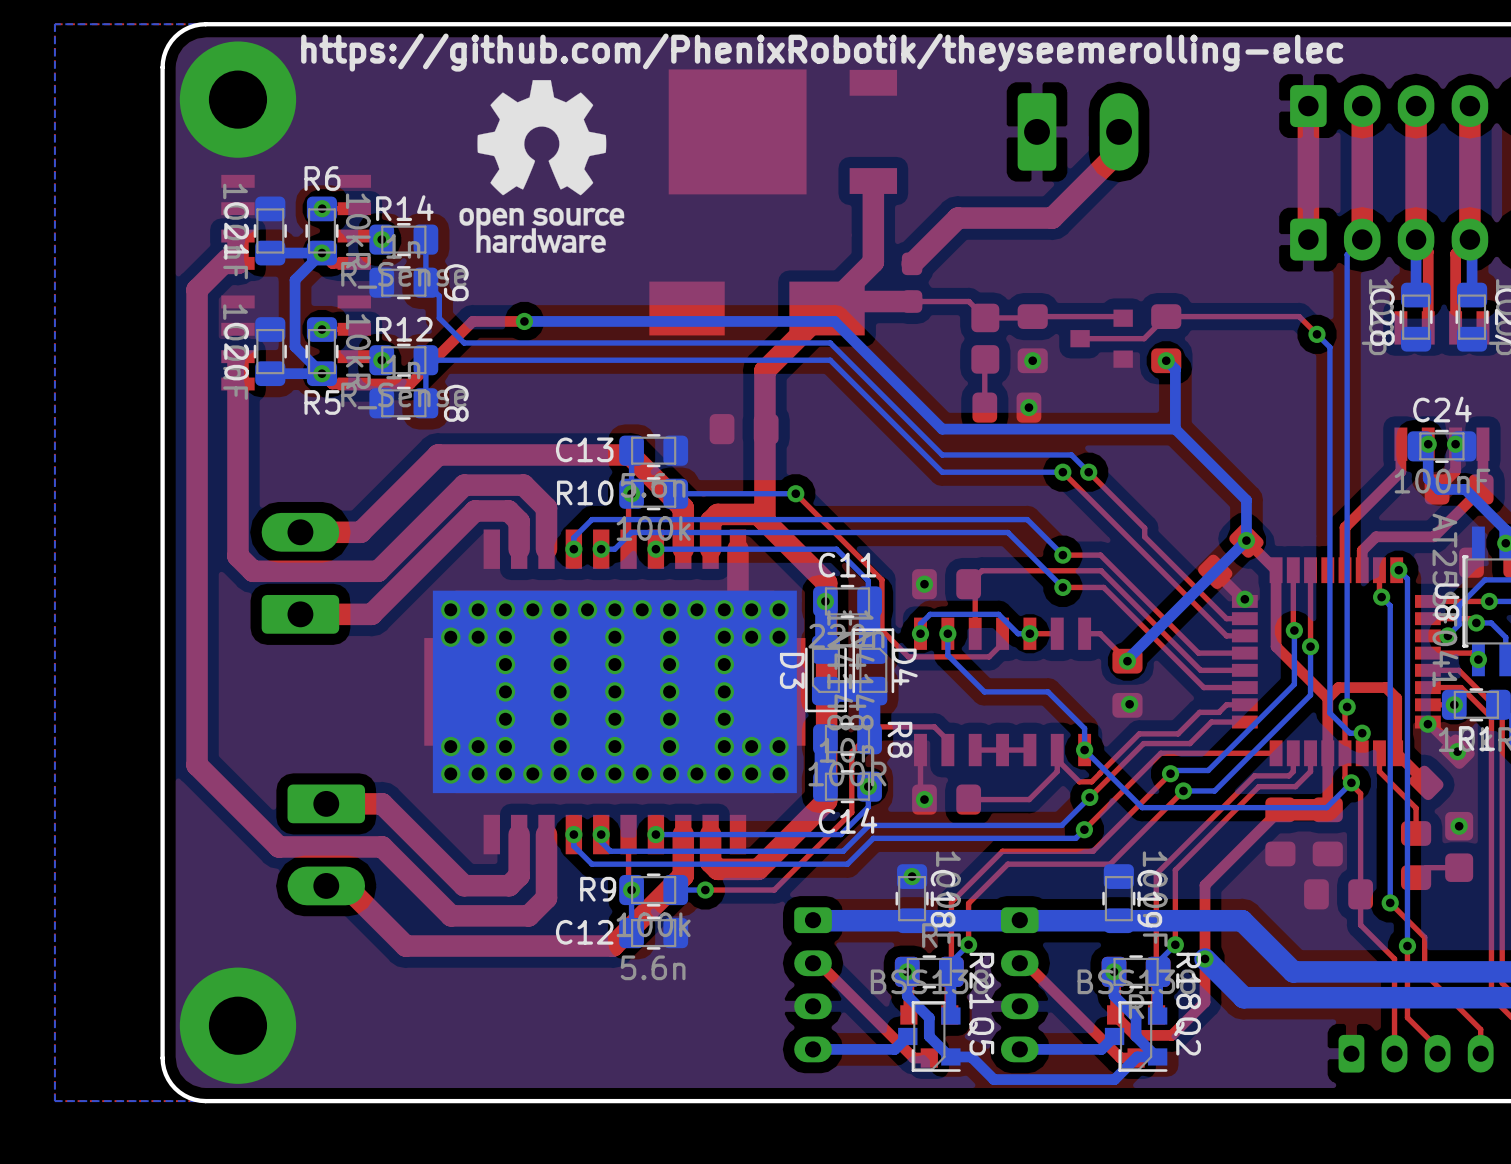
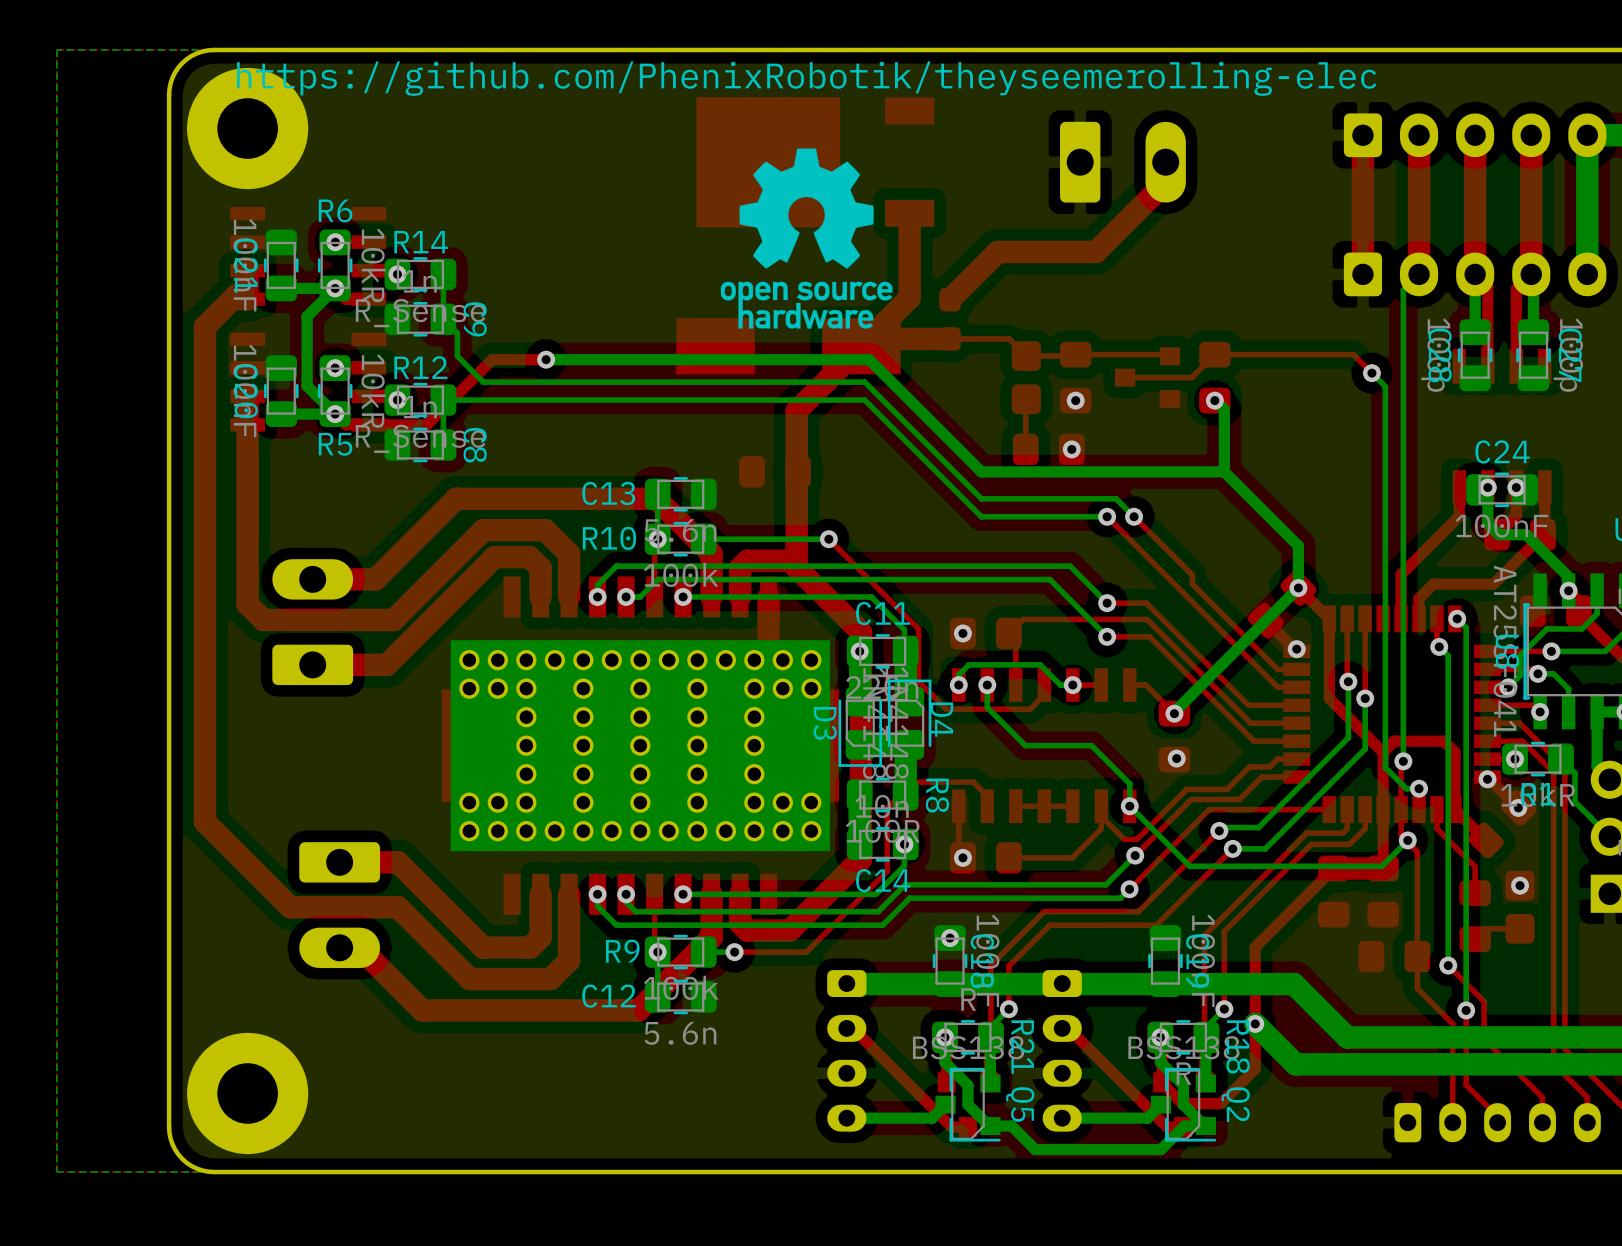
text position: https://github.com/PhenixRobotik/theyseemerolling-elec (822, 52) -> https://github.com/PhenixRobotik/theyseemerolling-elec (806, 78)
drawing position: (541, 166) -> (806, 238)

